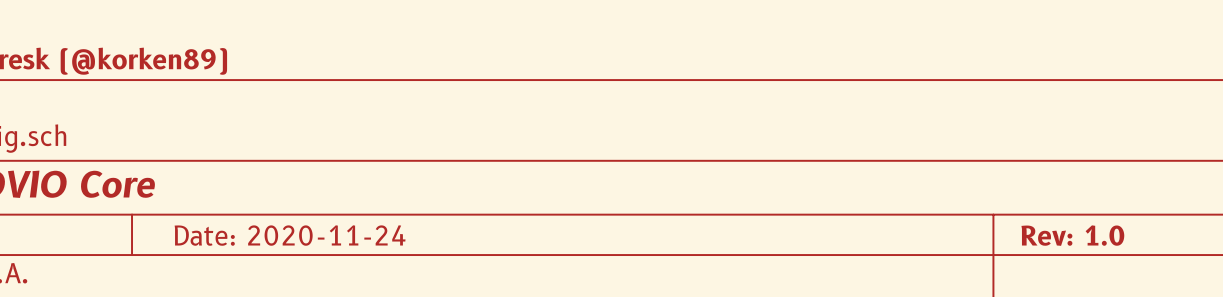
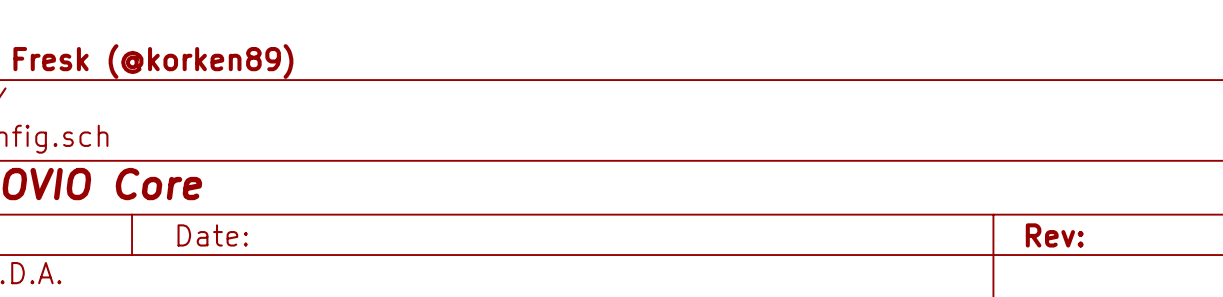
title block: Date: 2020-11-24 (290, 235) -> Date: (212, 235)
title block: Rev: 1.0 (1072, 235) -> Rev: (1054, 235)

